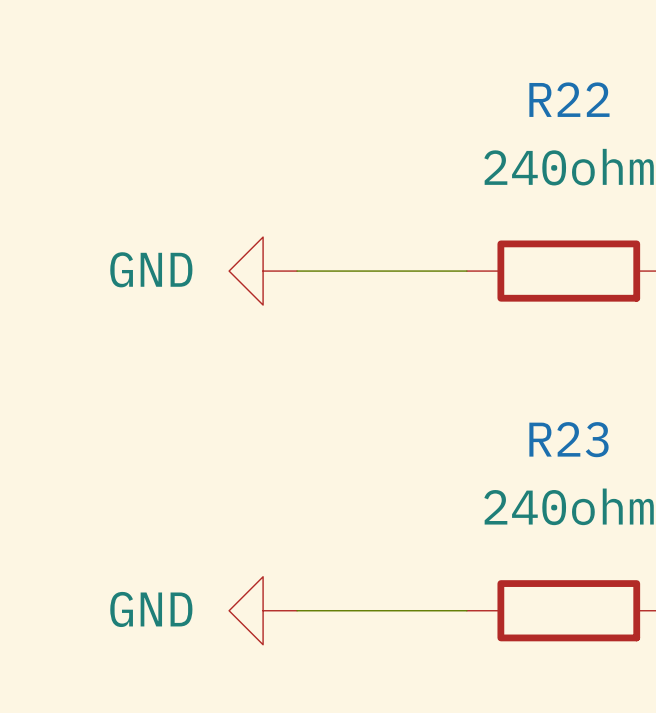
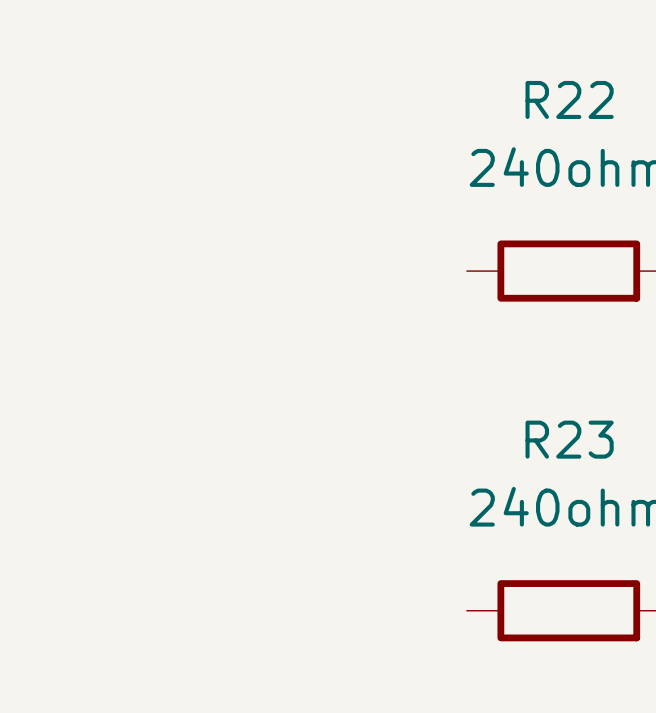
power symbol: GND (263, 271) -> none
wire: (297, 271) (466, 271) -> none
power symbol: GND (263, 610) -> none
wire: (297, 610) (466, 610) -> none

